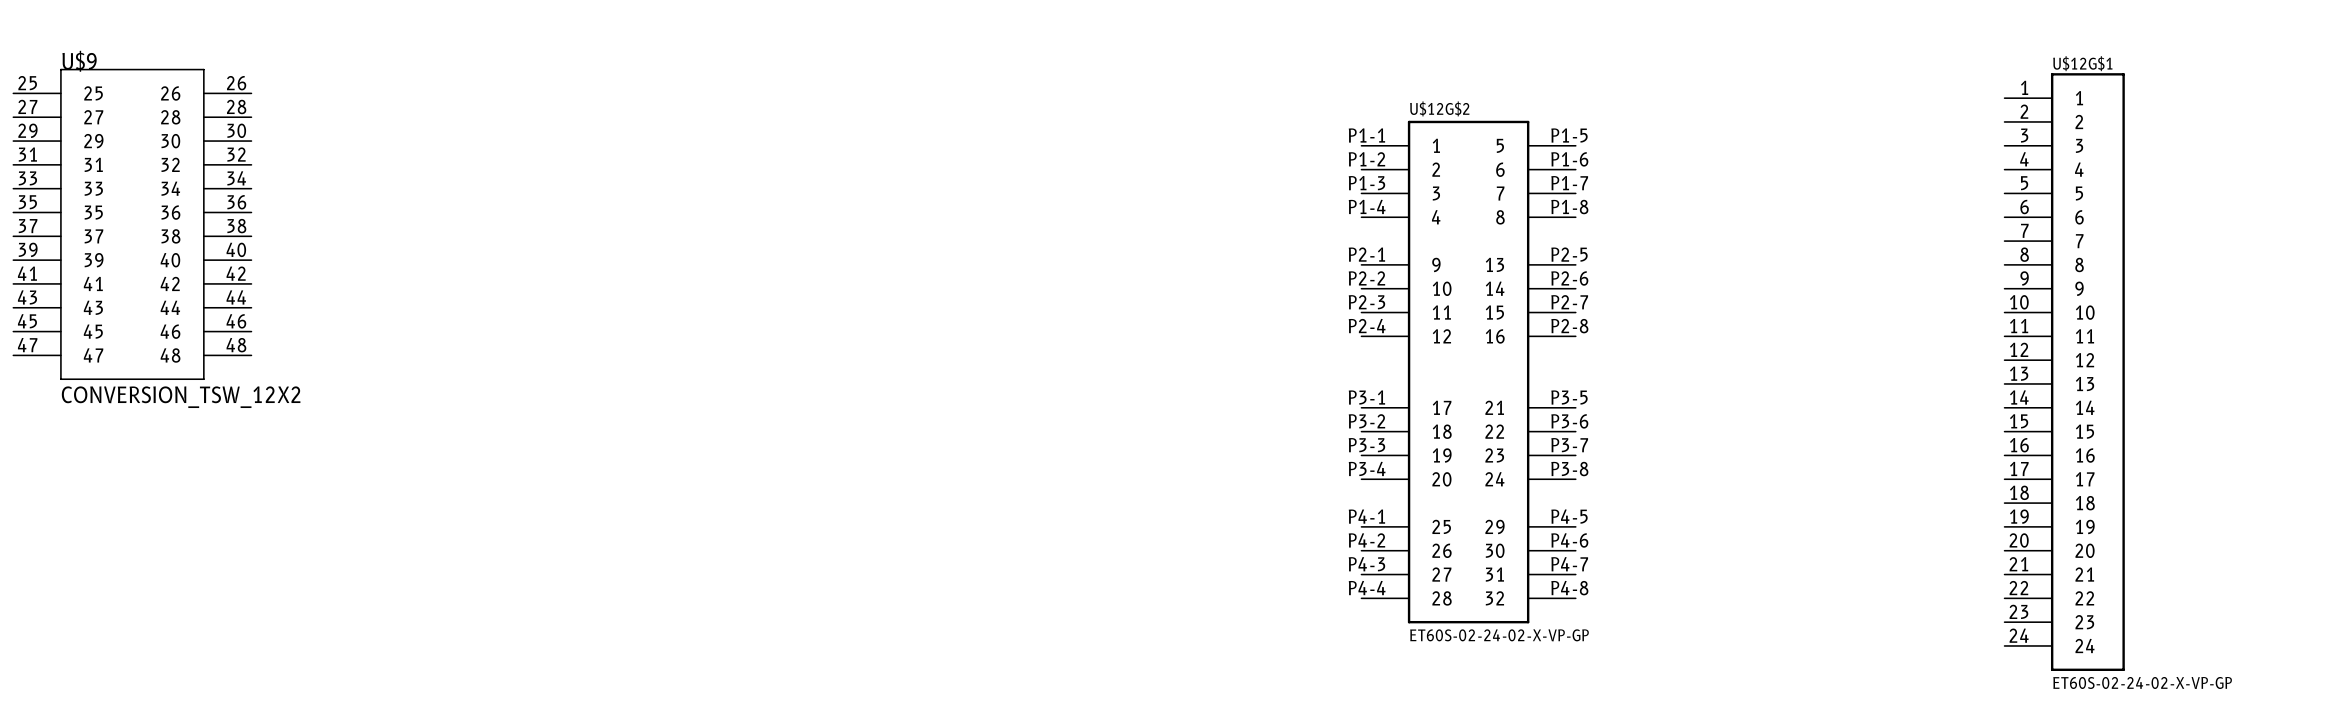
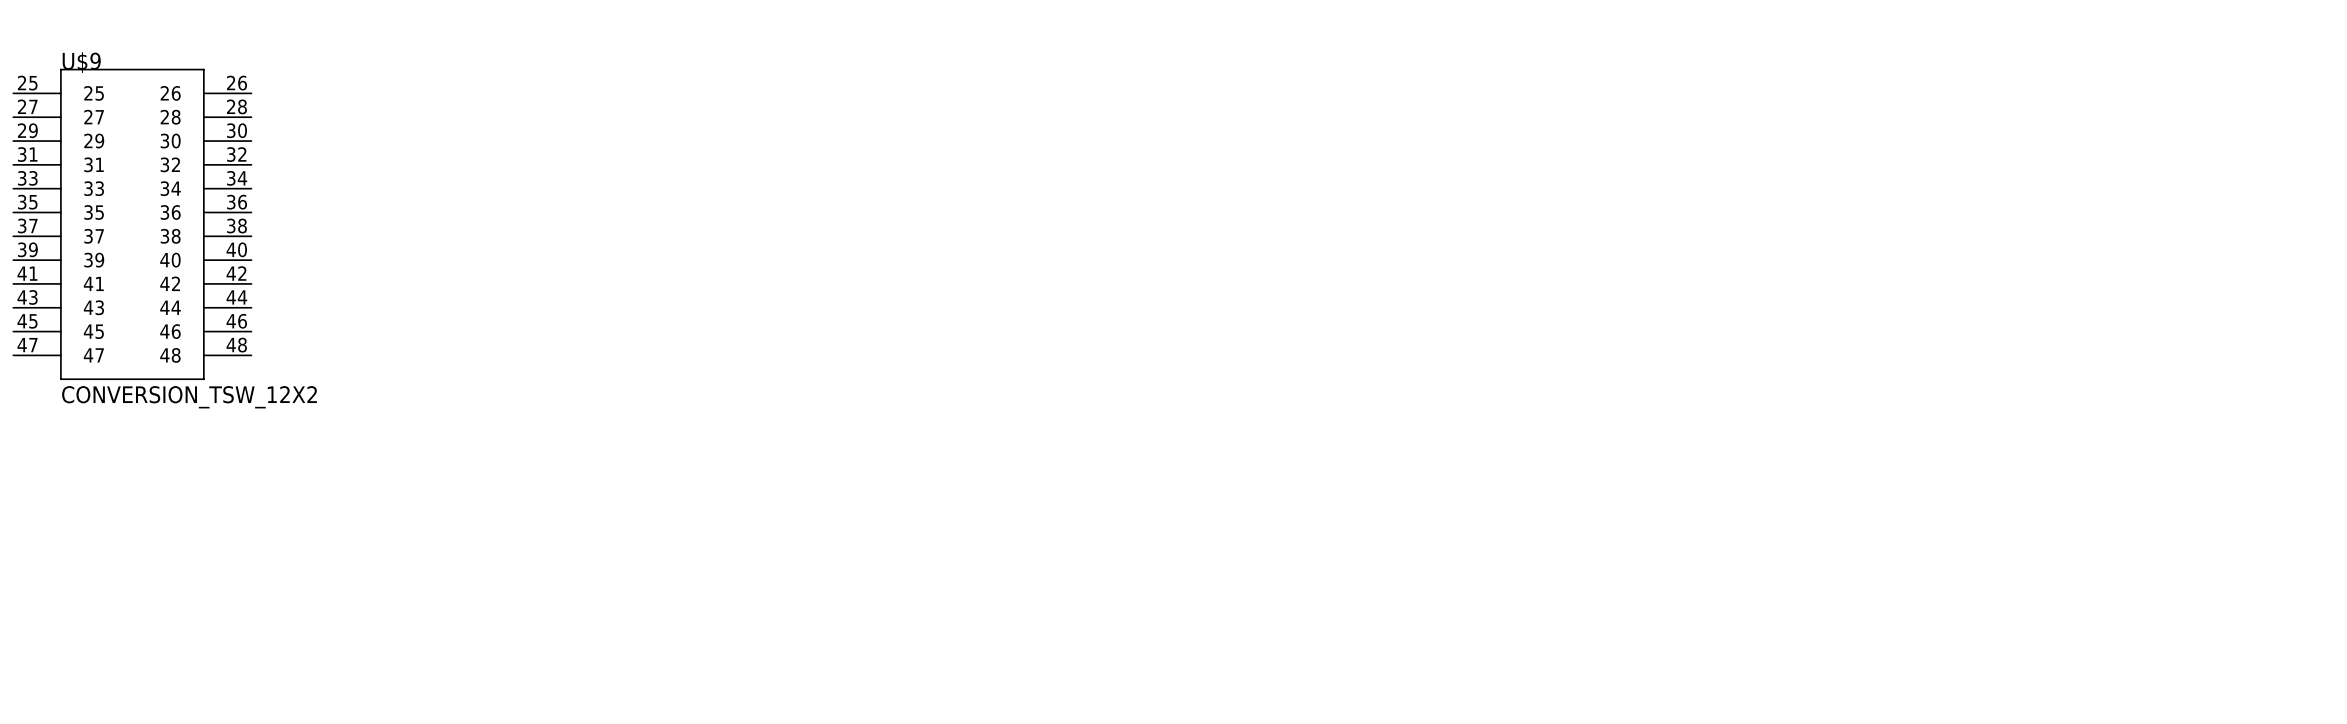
U$12G$2: ET60S-02-24-02-X-VP-GP (1468, 372) -> none
U$12G$1: ET60S-02-24-02-X-VP-GP (2064, 372) -> none

